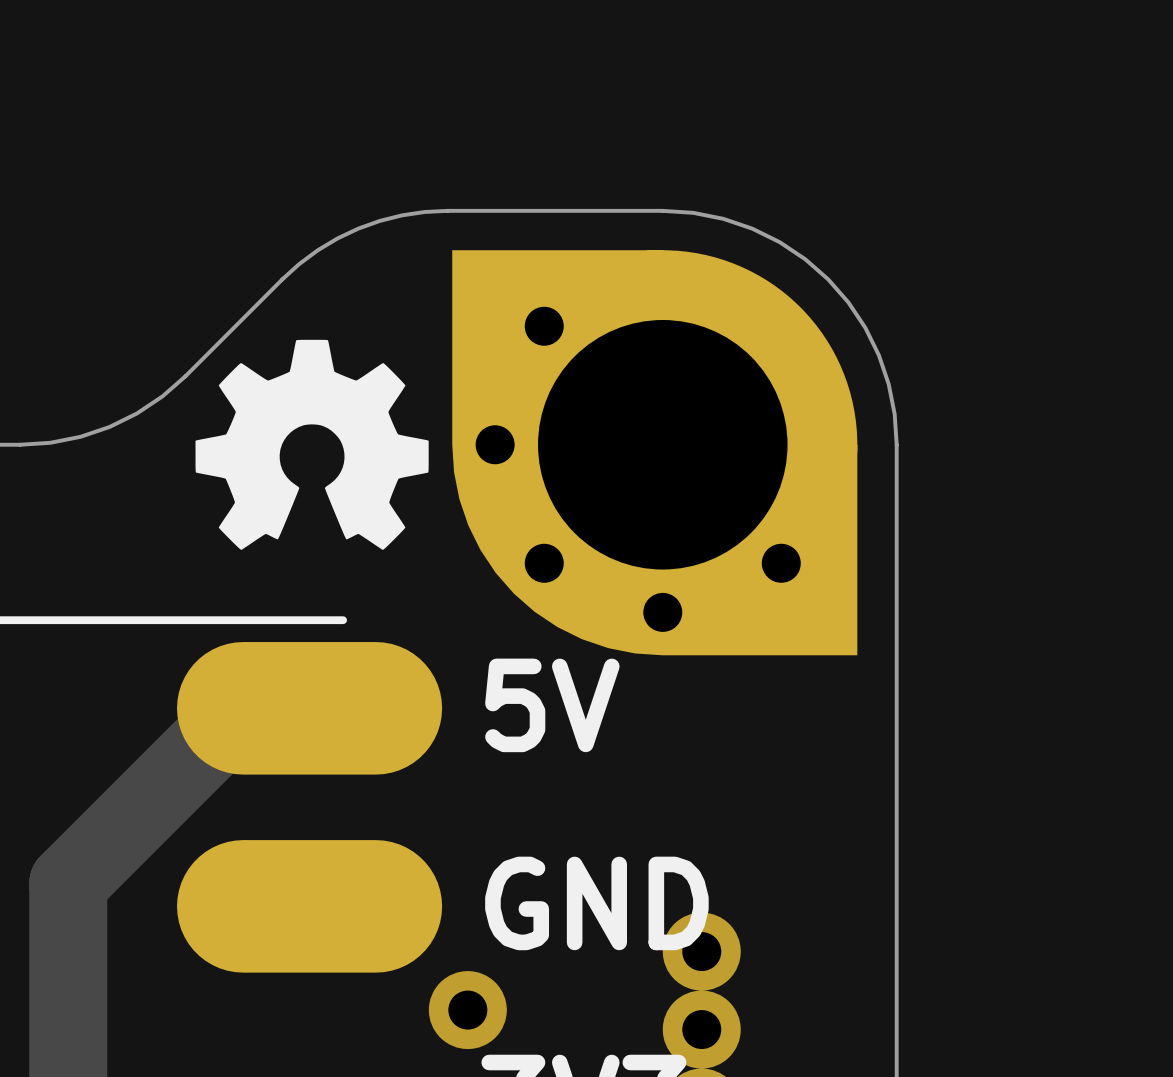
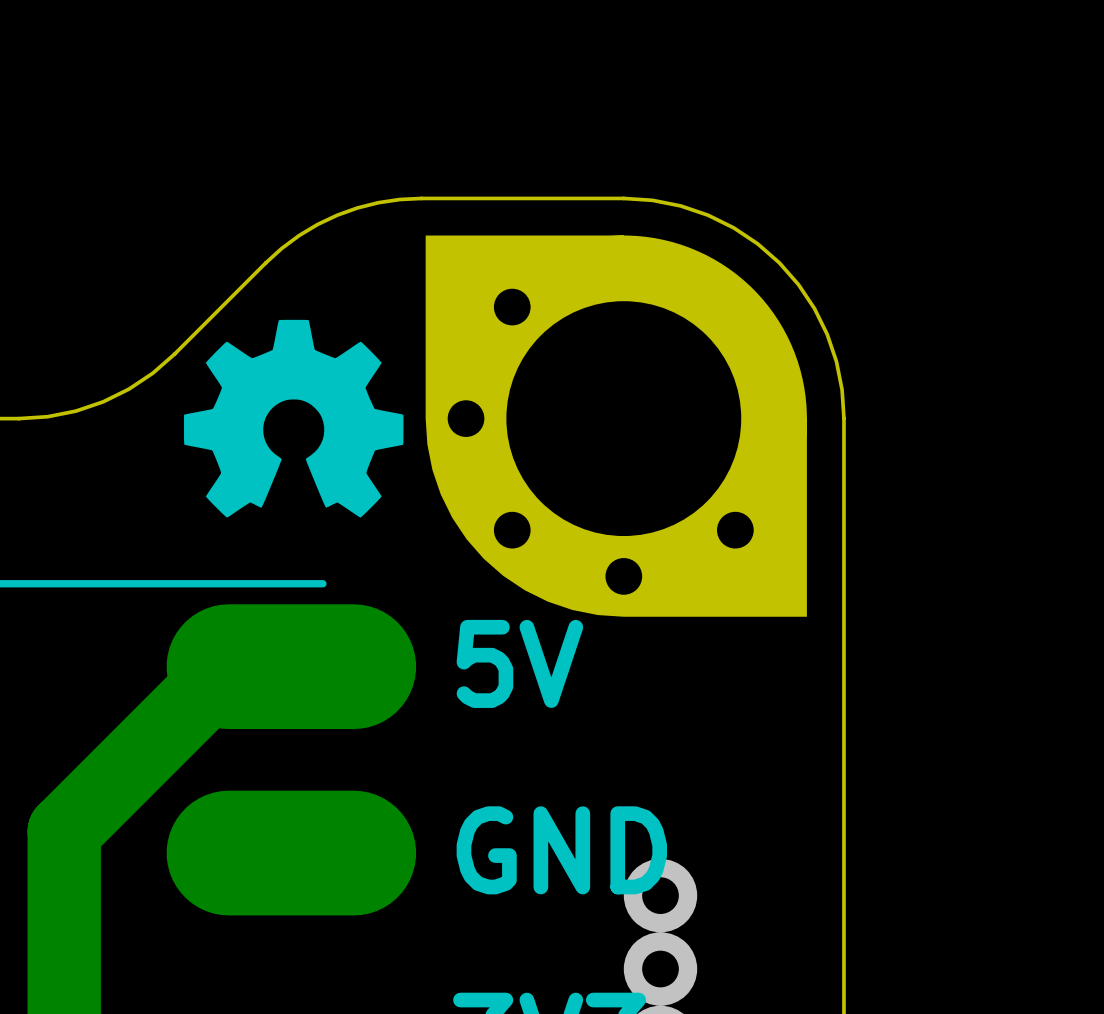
via: (467, 1010) -> none

